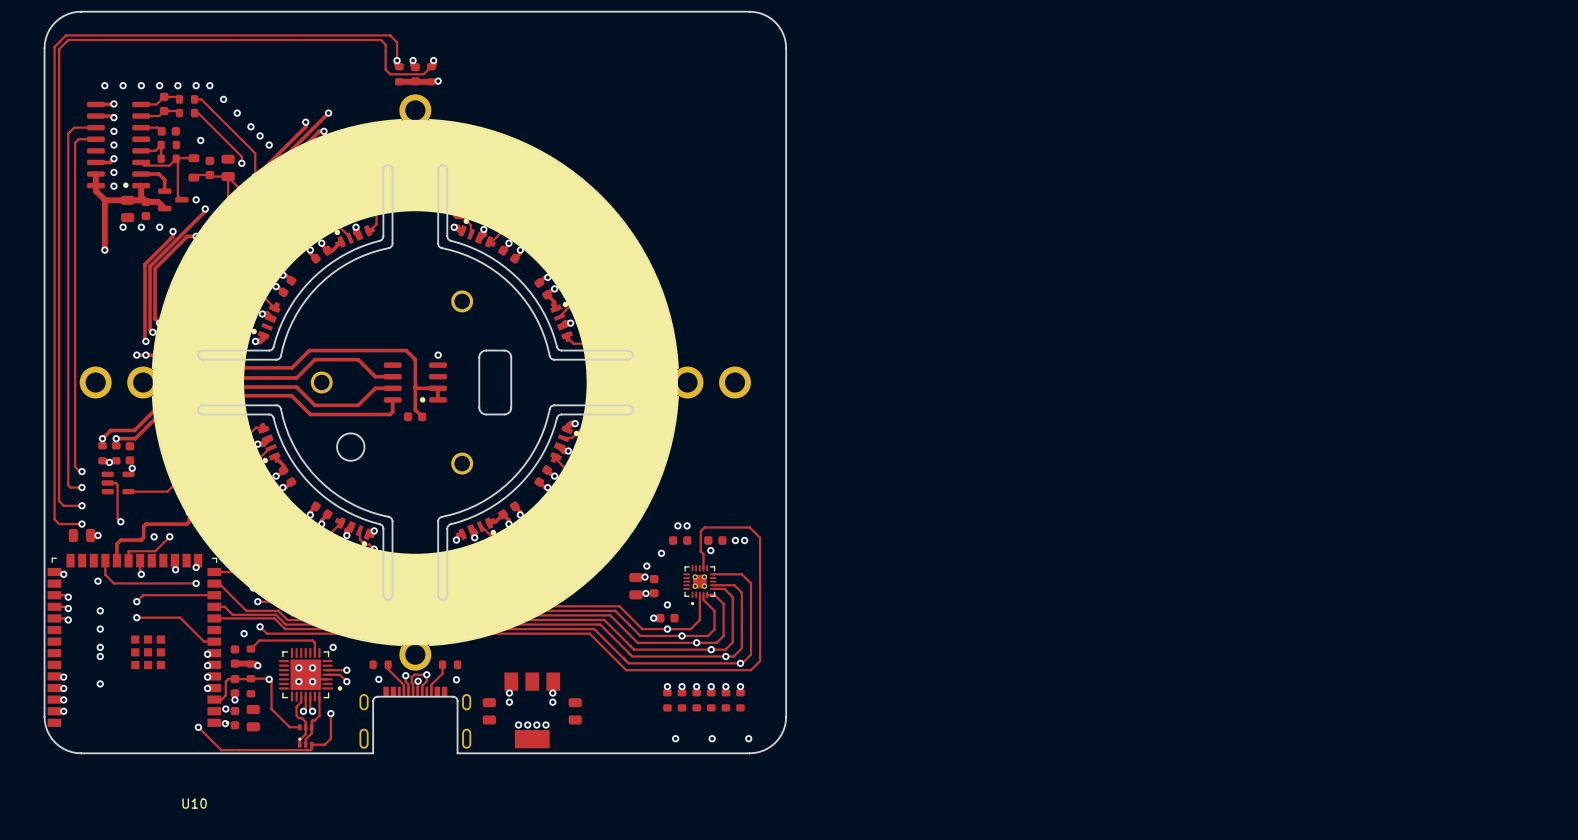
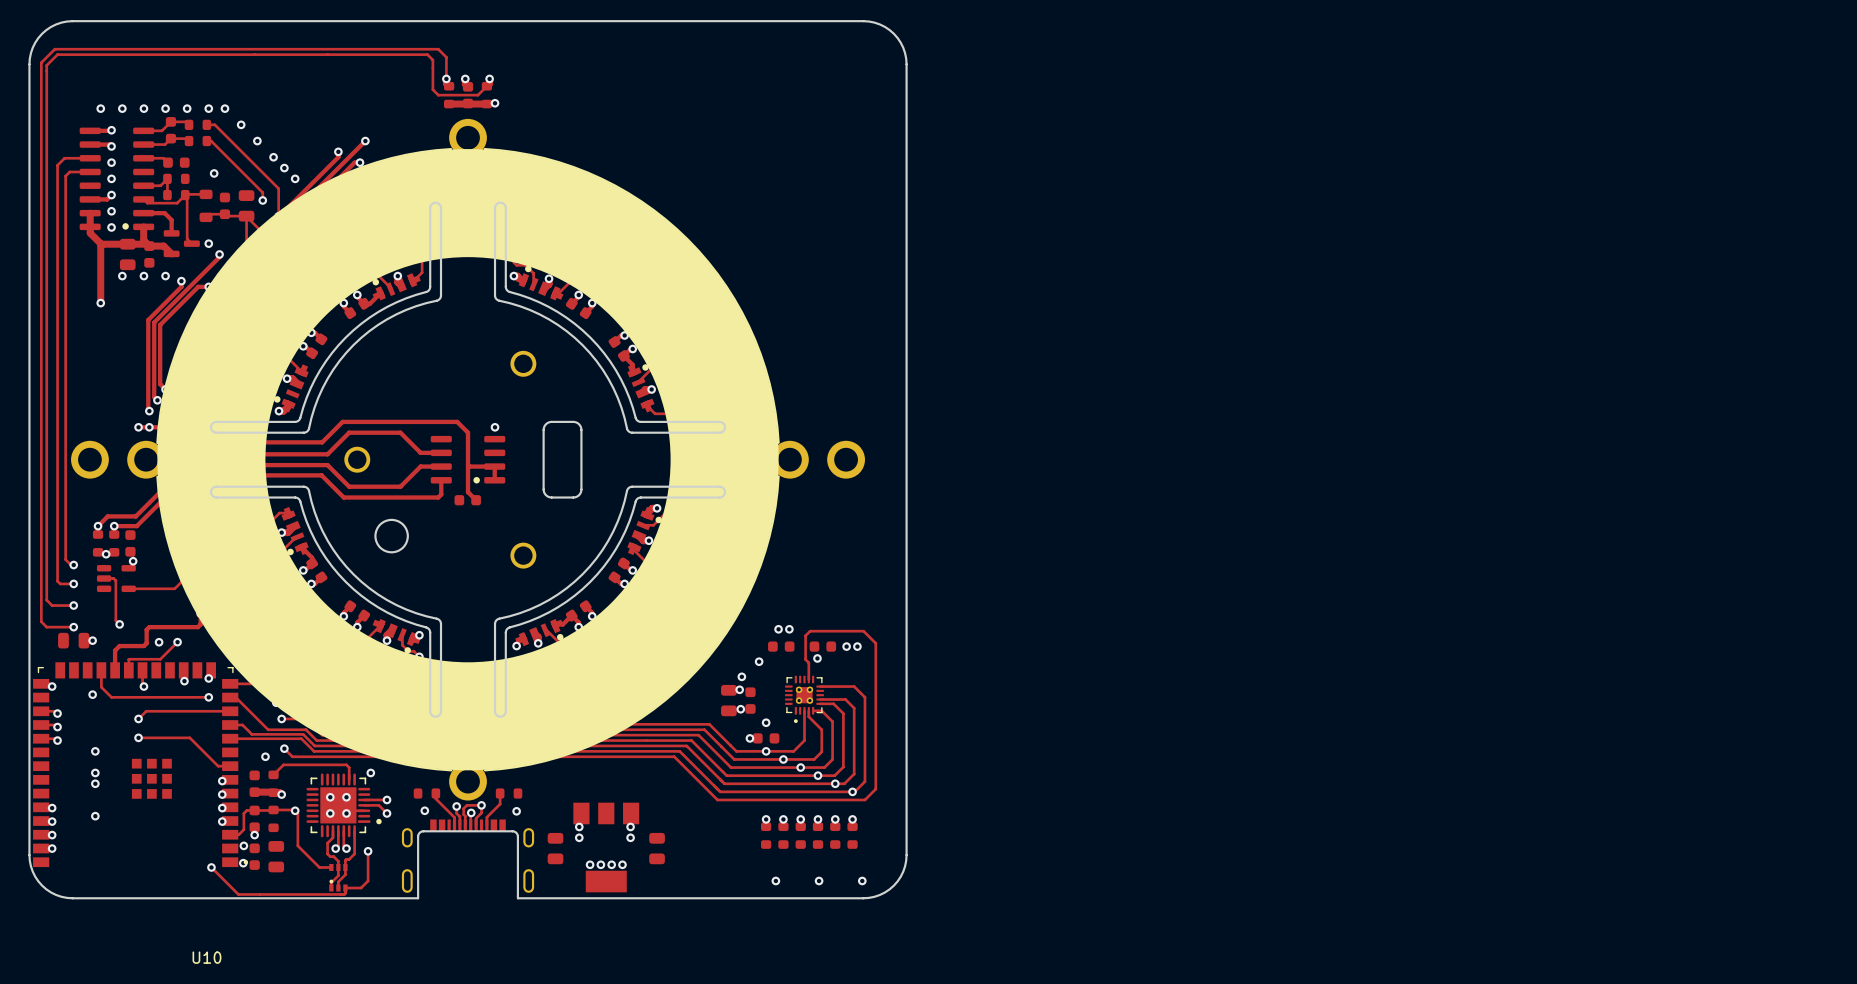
via: (100, 610) -> none

